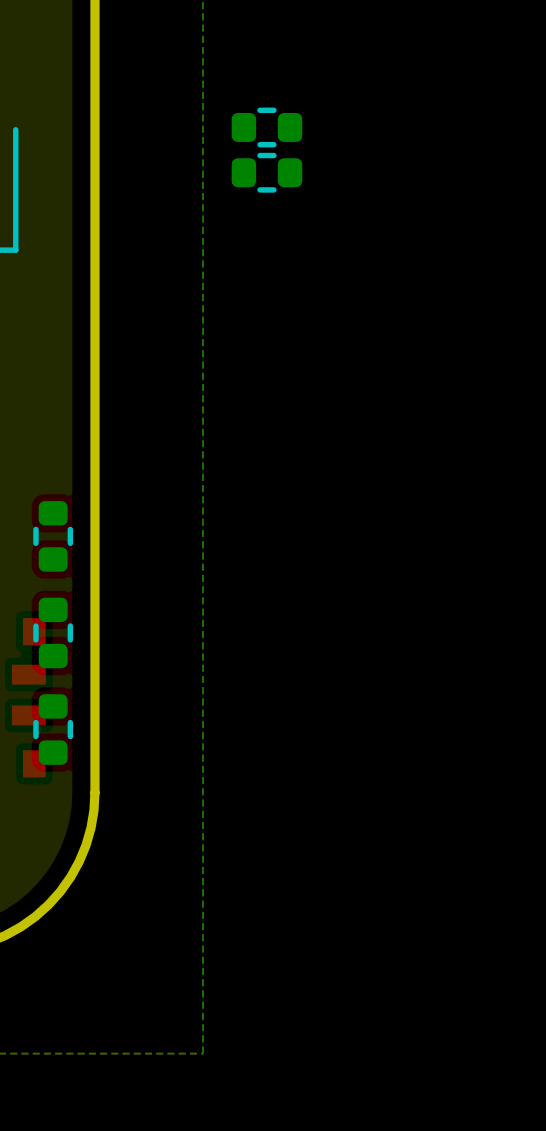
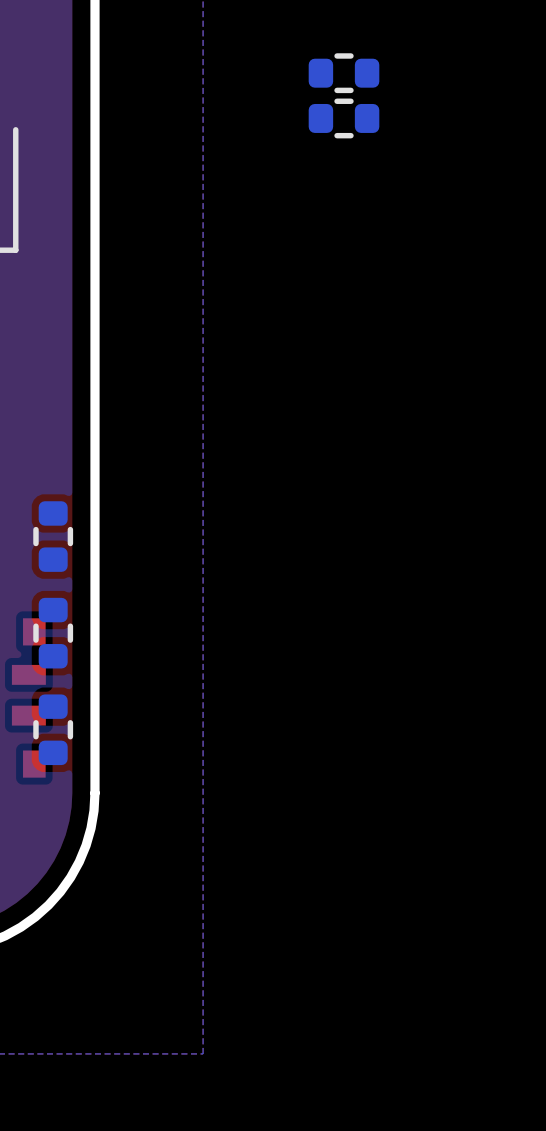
part: none -> (344, 73)
part: none -> (344, 118)
part: (266, 127) -> none
part: (266, 172) -> none

